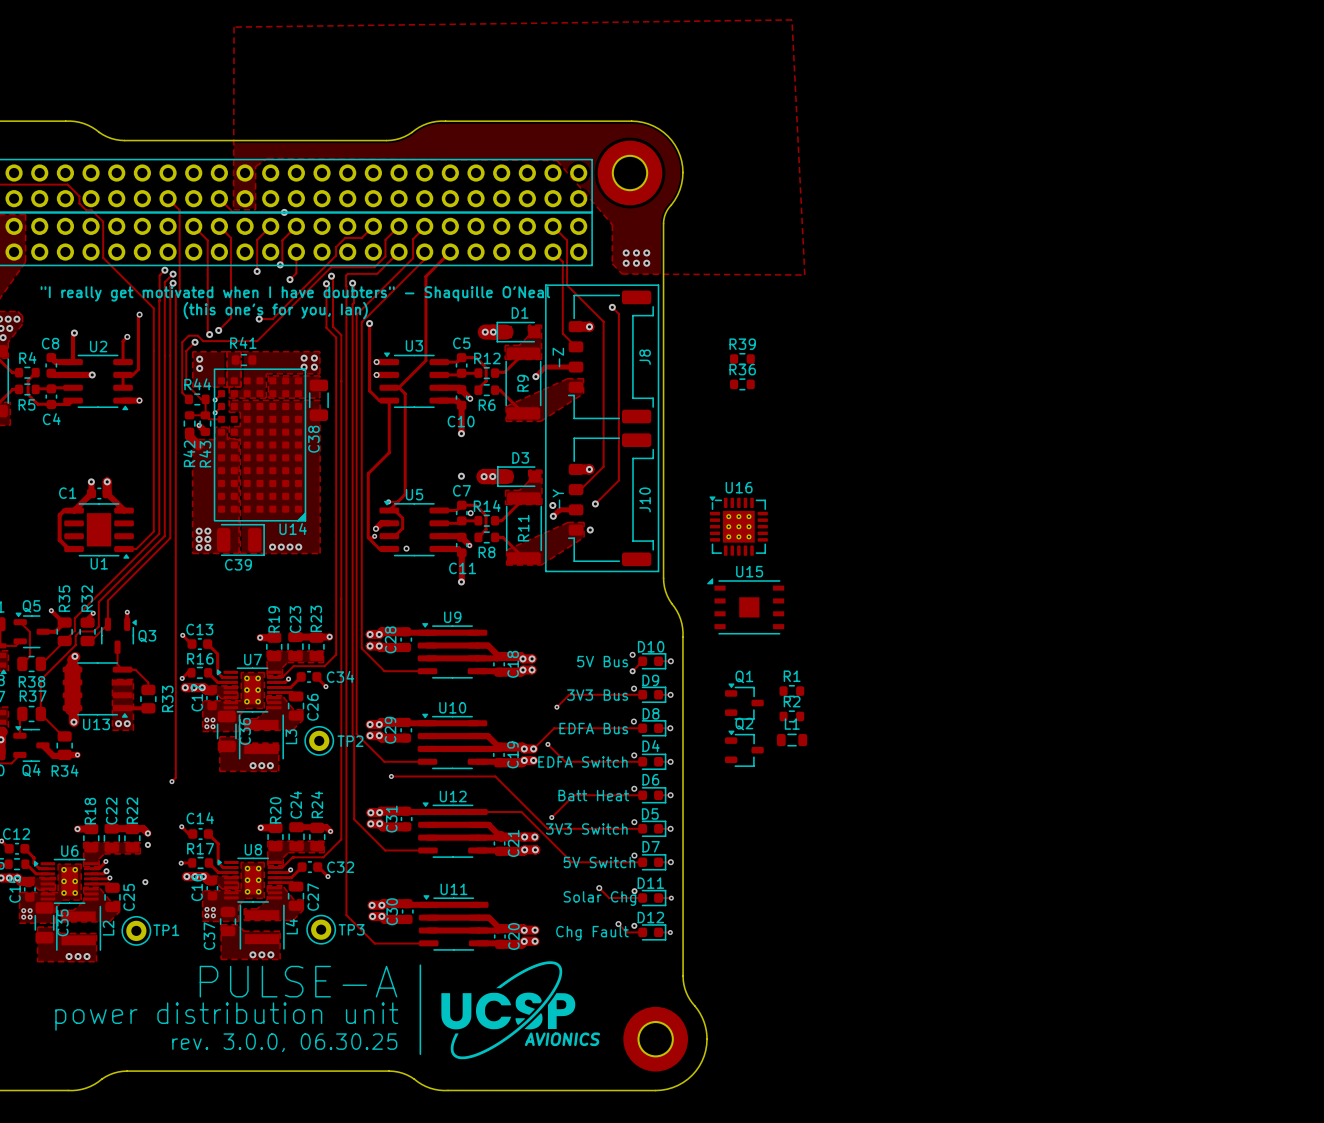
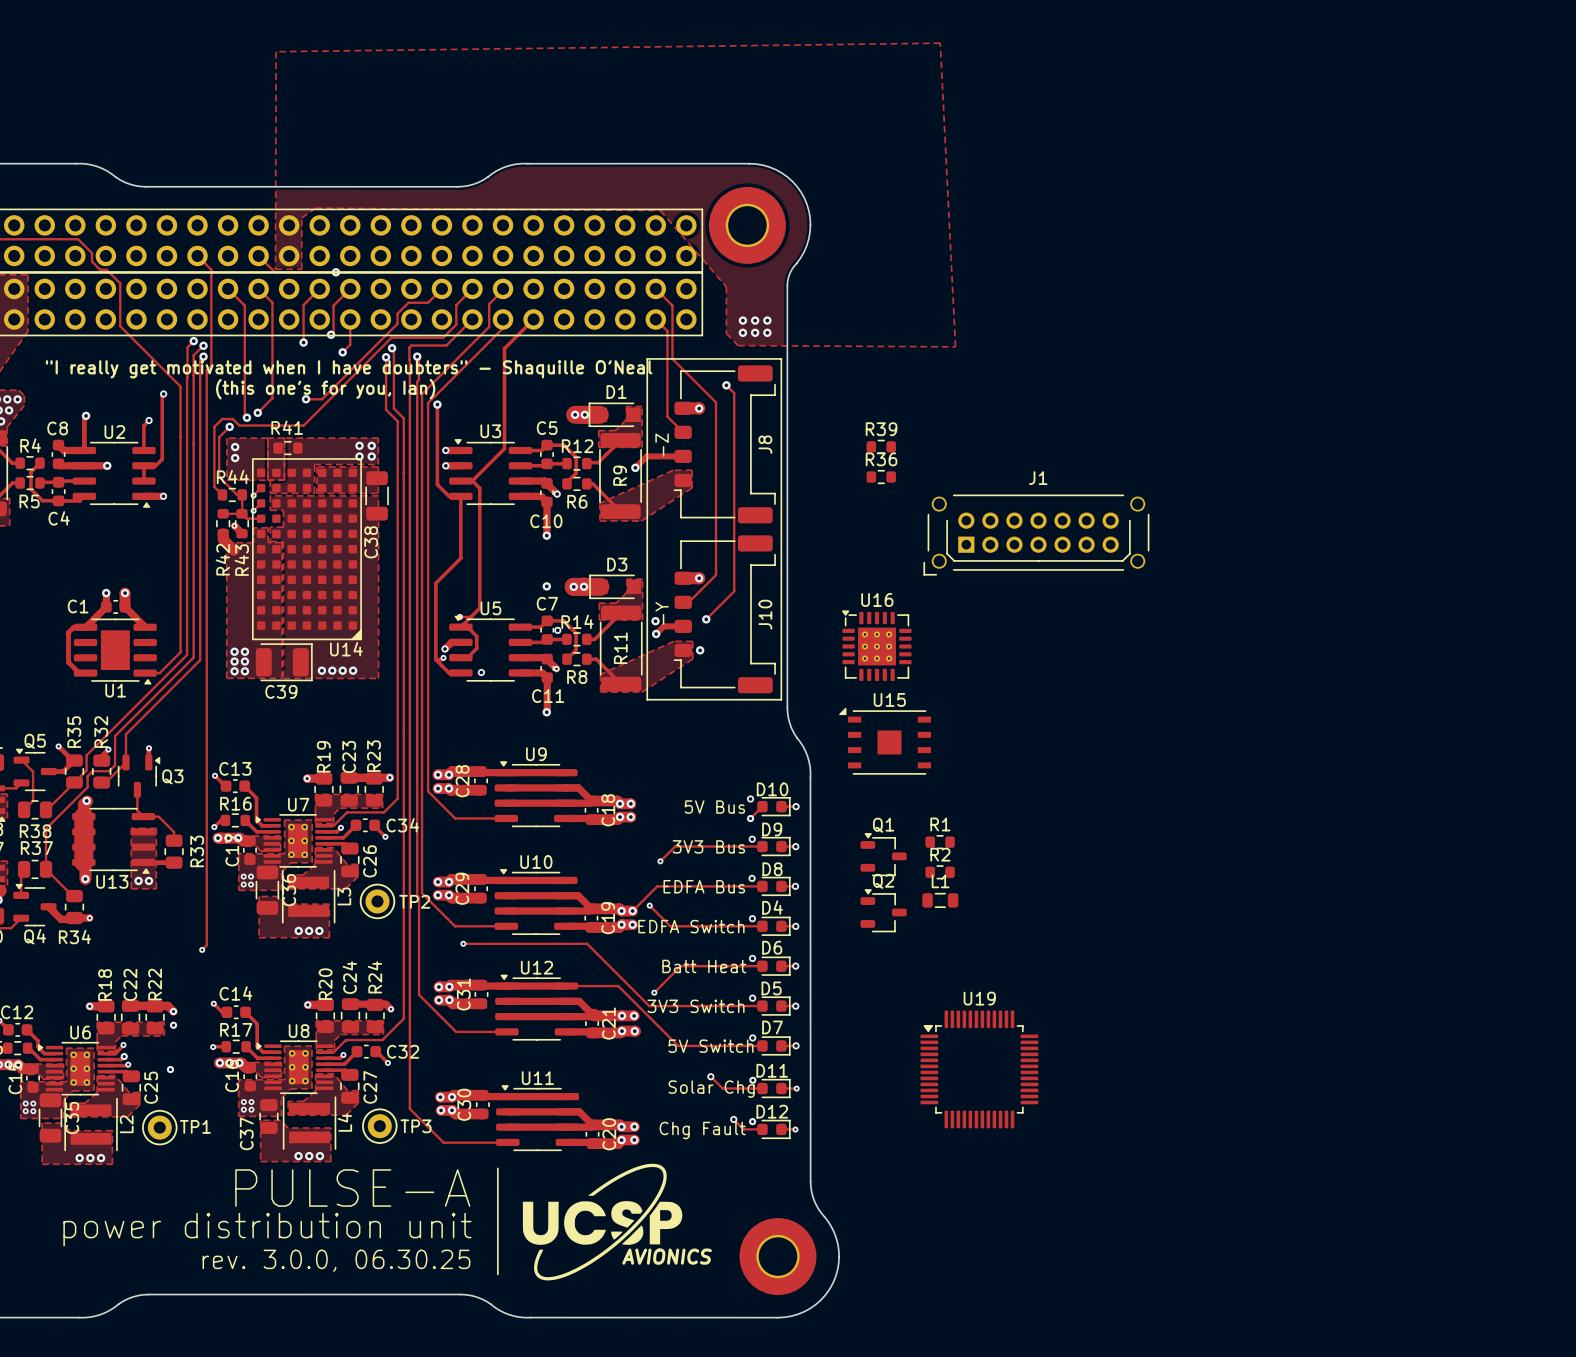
J1: none -> (1036, 535)
U19: none -> (979, 1069)

